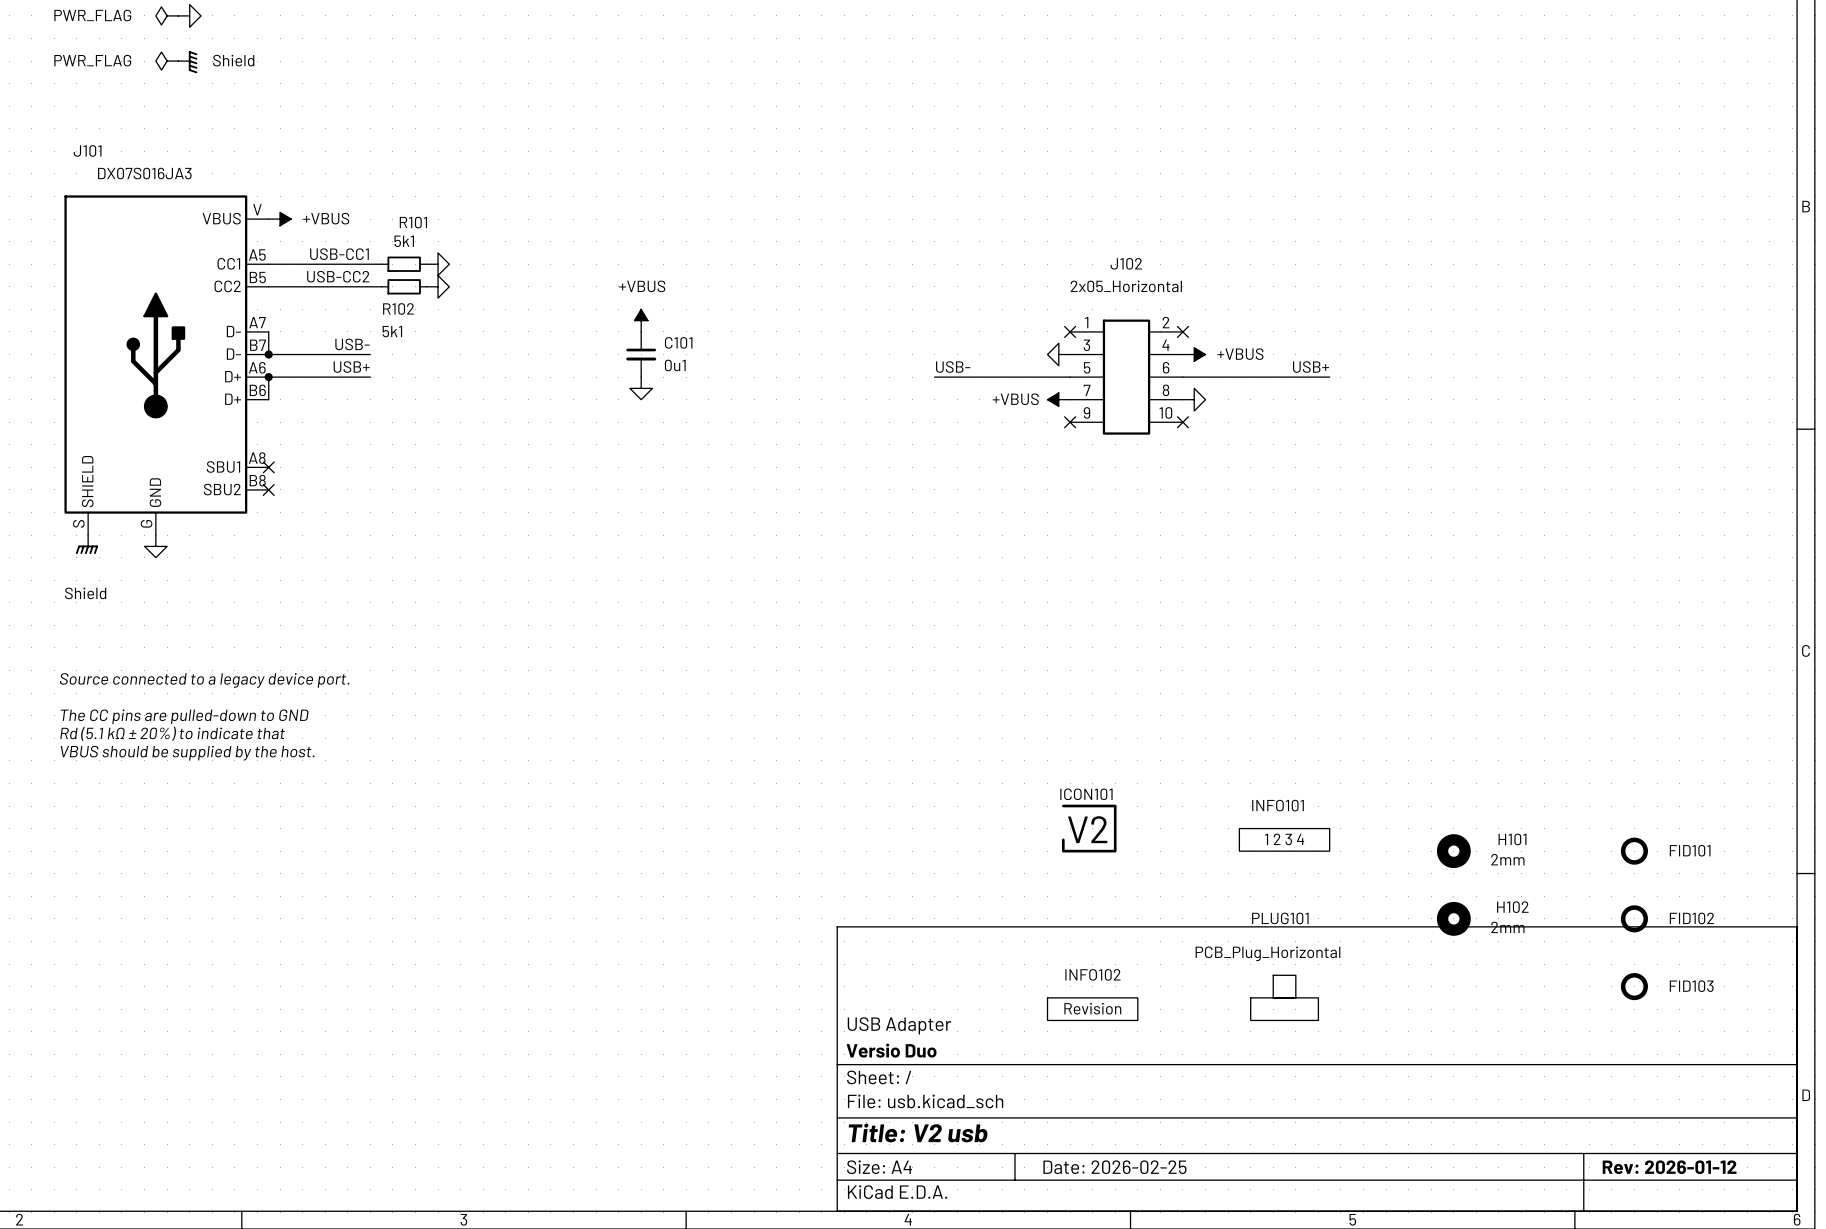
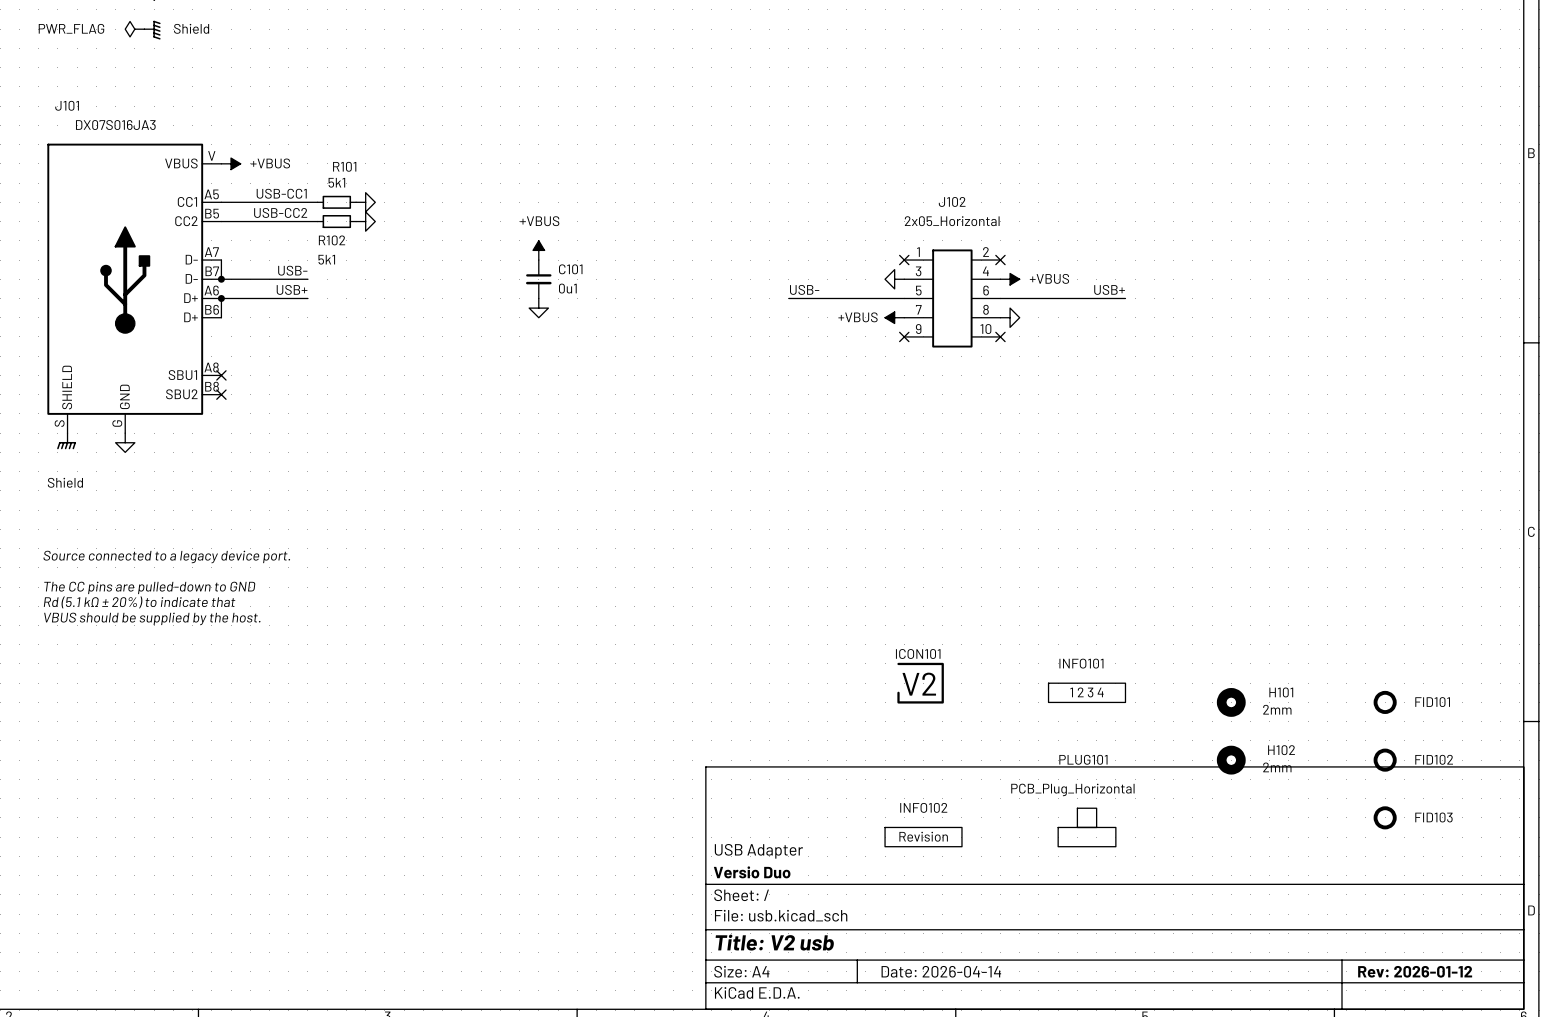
title block: Date: 2026-02-25 (1114, 1167) -> Date: 2026-04-14 (941, 971)

